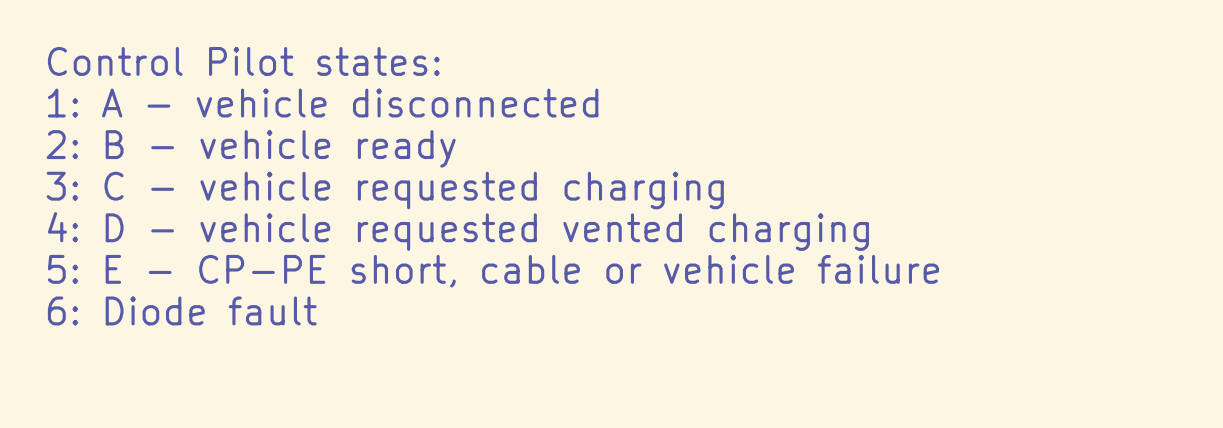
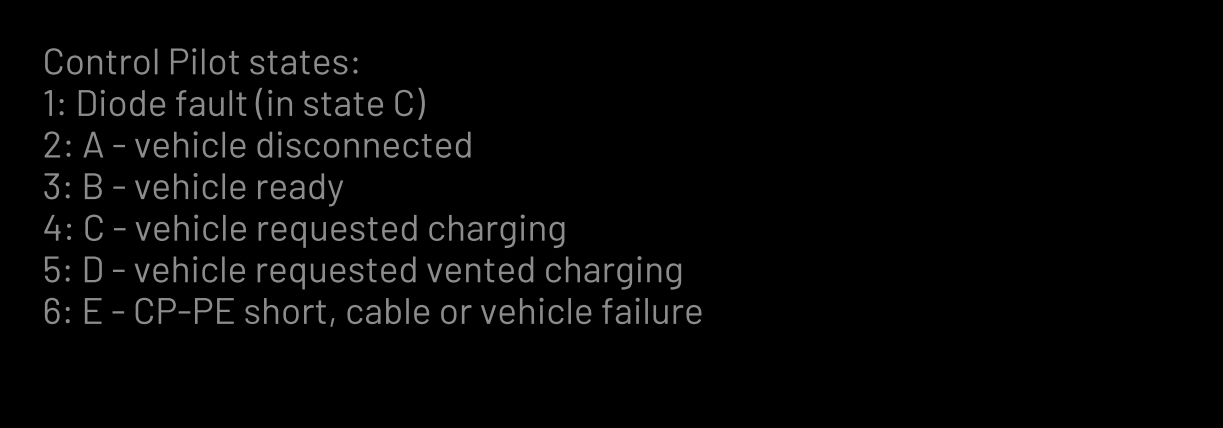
text: 1: A - vehicle disconnected (323, 103) -> 1: Diode fault (in state C) (234, 103)
text: 2: B - vehicle ready (251, 148) -> 2: A - vehicle disconnected (257, 144)
text: 3: C - vehicle requested charging (385, 190) -> 3: B - vehicle ready (193, 189)
text: 4: D - vehicle requested vented charging (458, 231) -> 4: C - vehicle requested charging (304, 231)
text: 5: E - CP-PE short, cable or vehicle failure (493, 271) -> 5: D - vehicle requested vented charging (363, 272)
text: 6: Diode fault (182, 310) -> 6: E - CP-PE short, cable or vehicle failure (373, 312)

